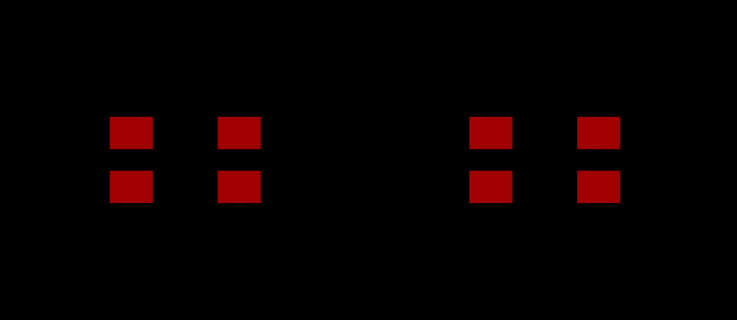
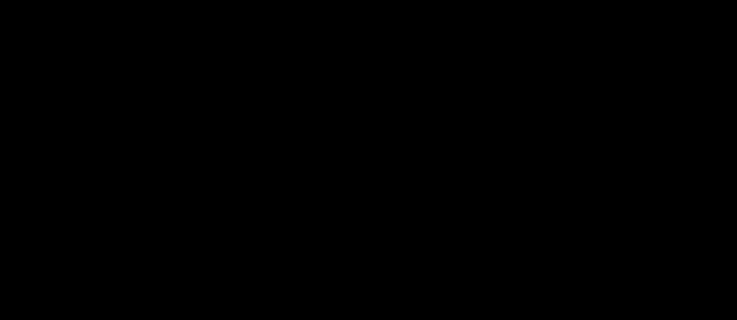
part: (185, 159) -> none
part: (544, 159) -> none

